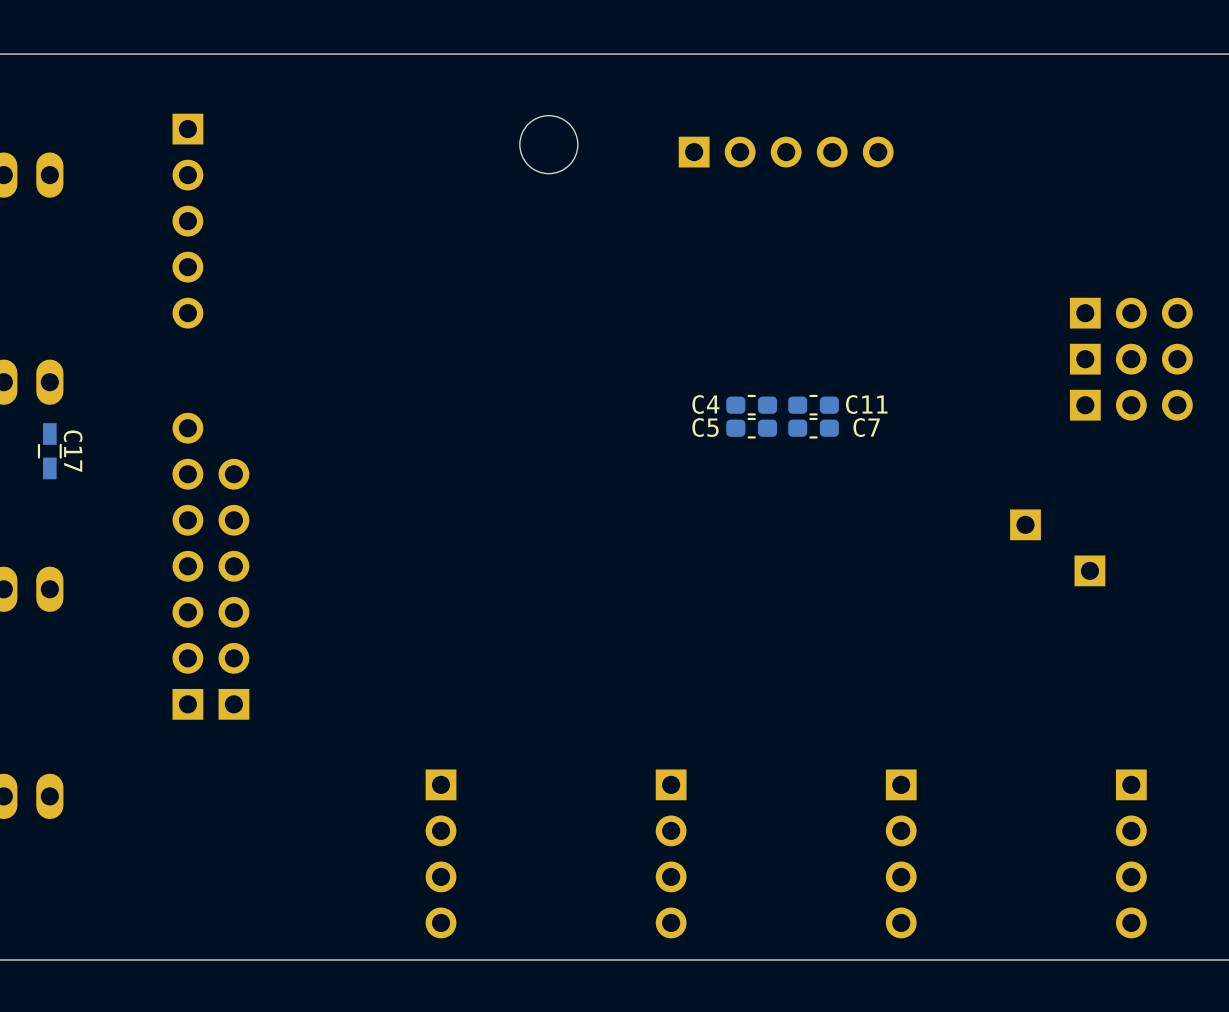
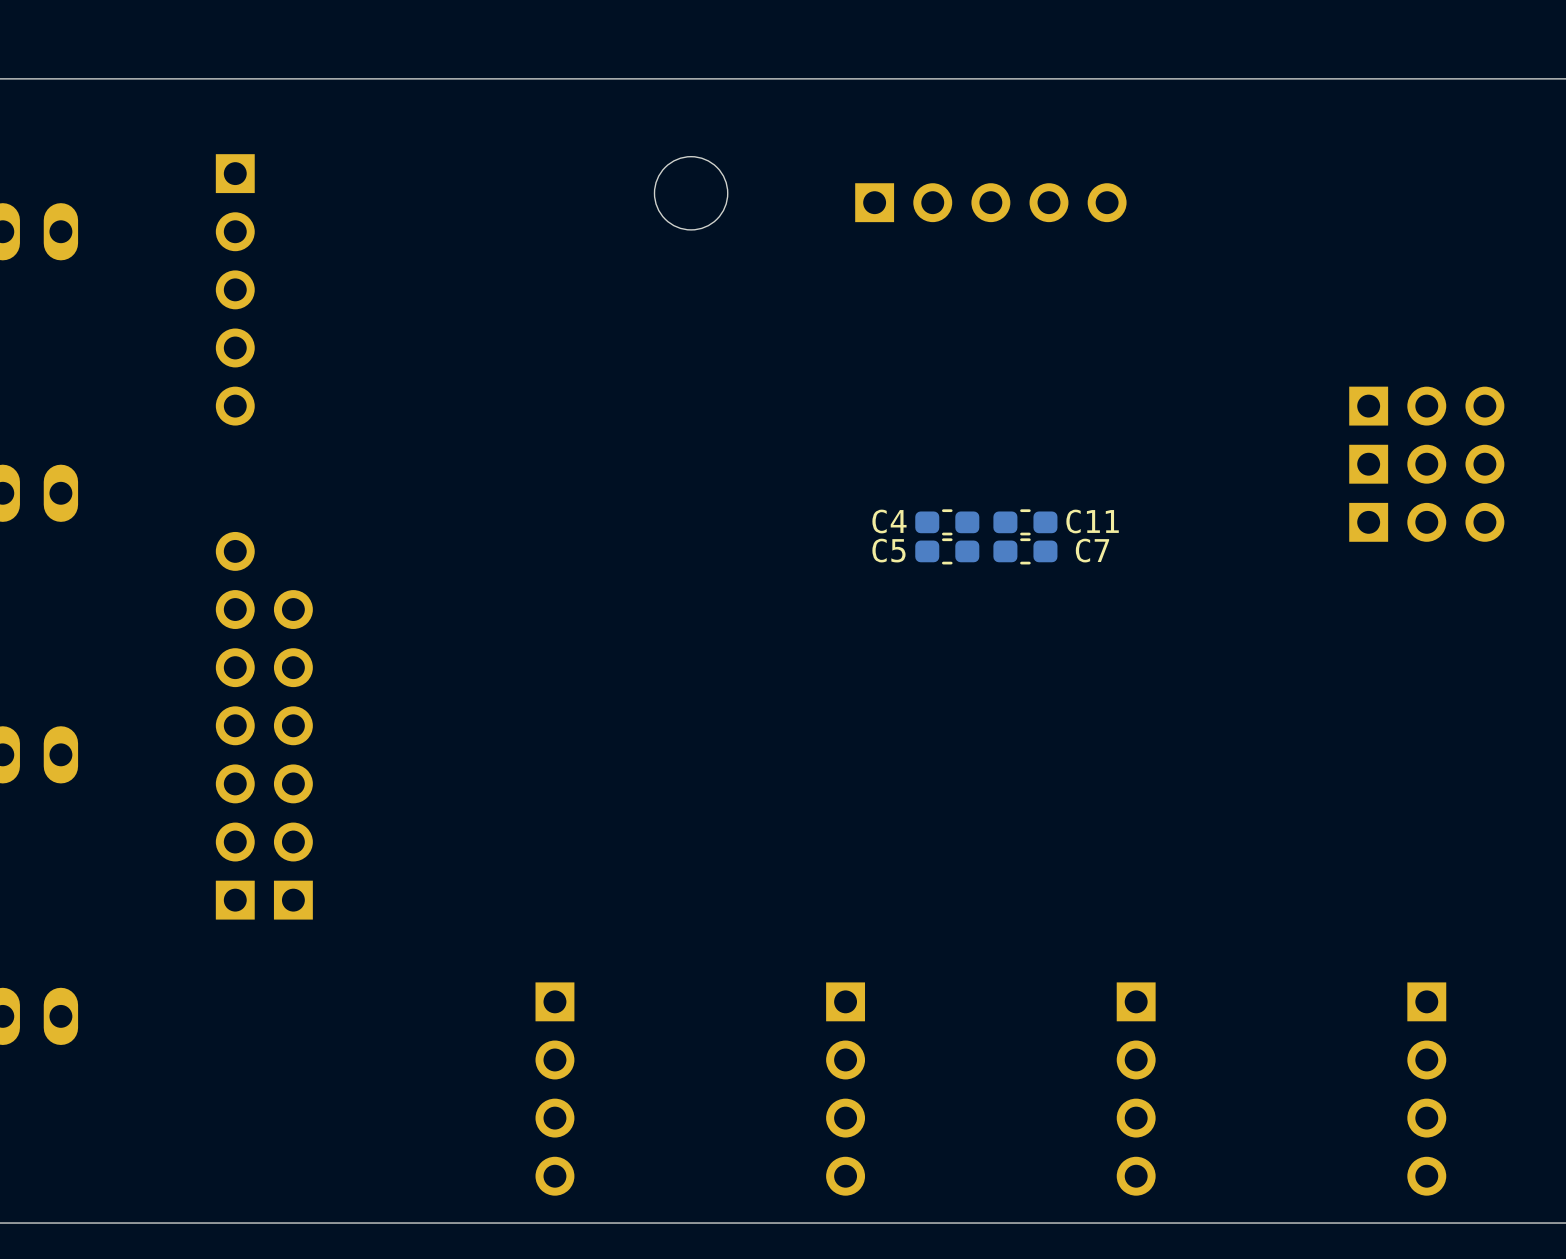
C17: (49, 451) -> none
part: (1025, 524) -> none
part: (1089, 570) -> none

